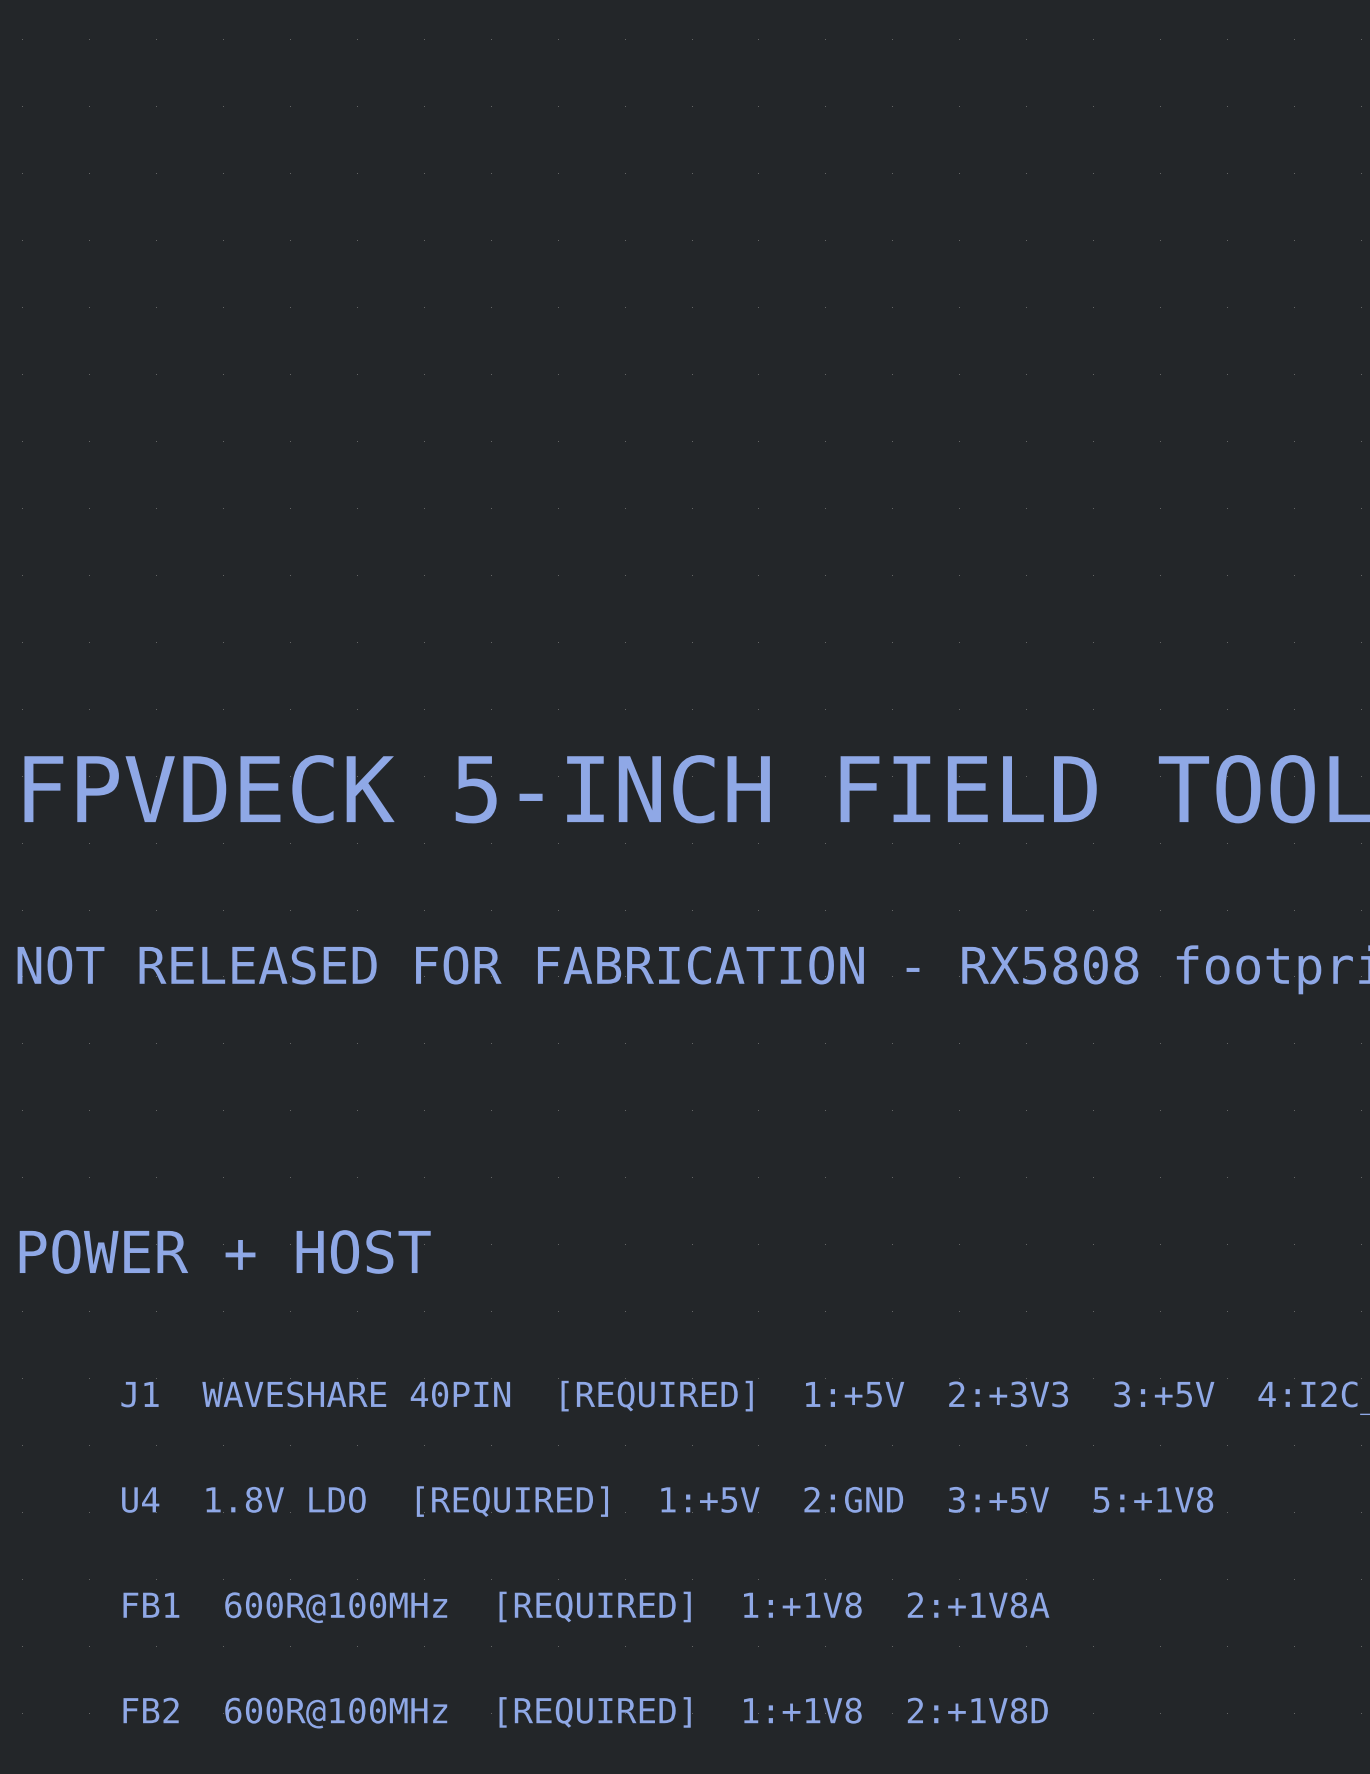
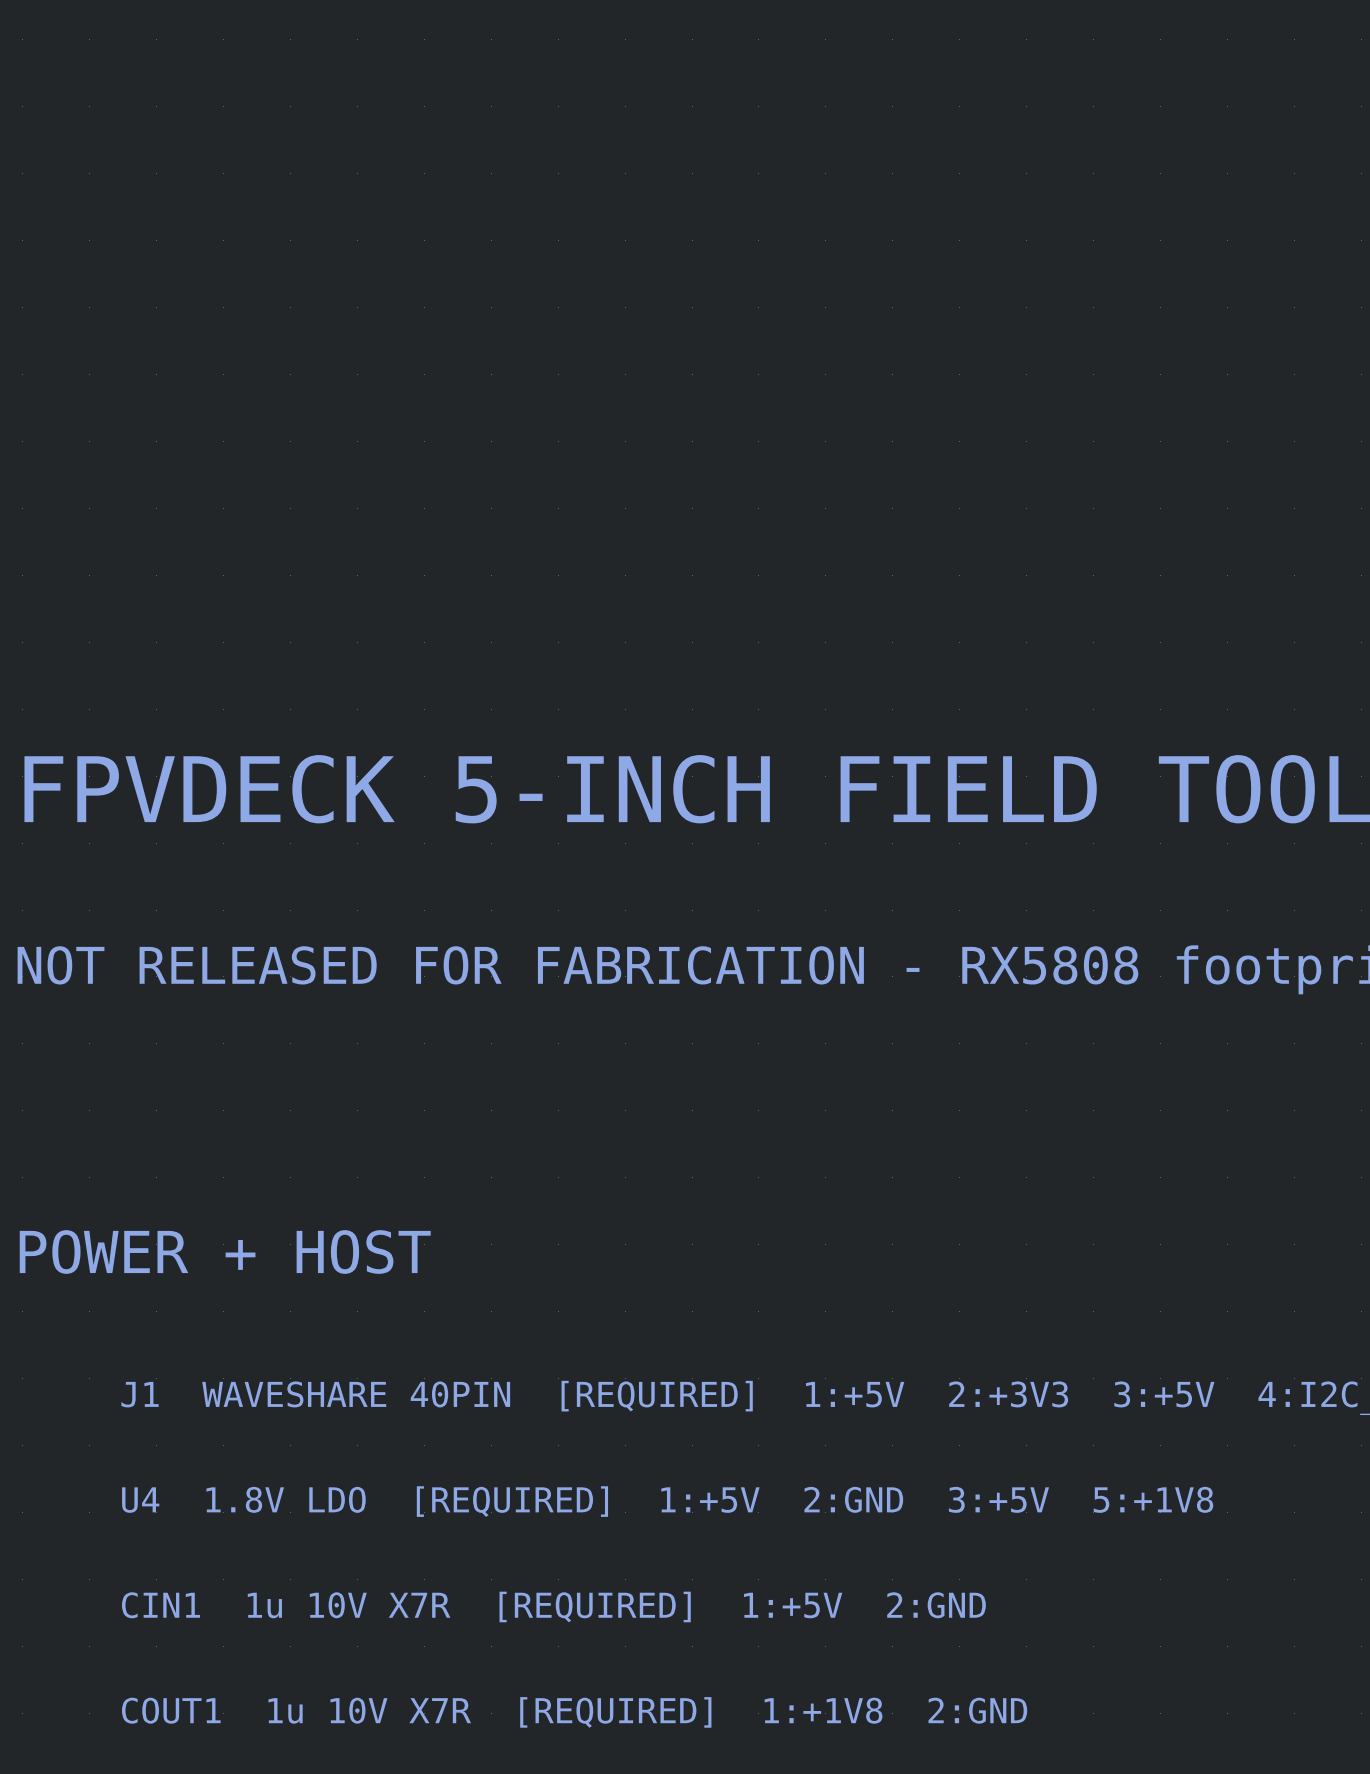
text: FB1 600R@100MHz [REQUIRED] 1:+1V8 2:+1V8A (586, 1607) -> CIN1 1u 10V X7R [REQUIRED] 1:+5V 2:GND (553, 1606)
text: FB2 600R@100MHz [REQUIRED] 1:+1V8 2:+1V8D (585, 1712) -> COUT1 1u 10V X7R [REQUIRED] 1:+1V8 2:GND (574, 1712)

